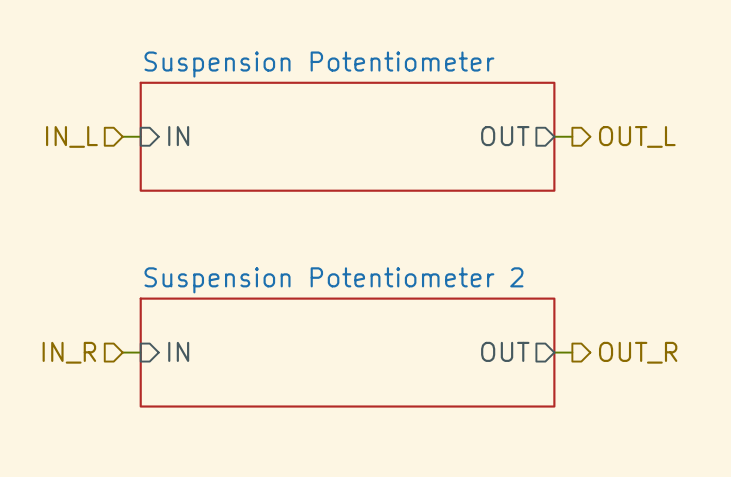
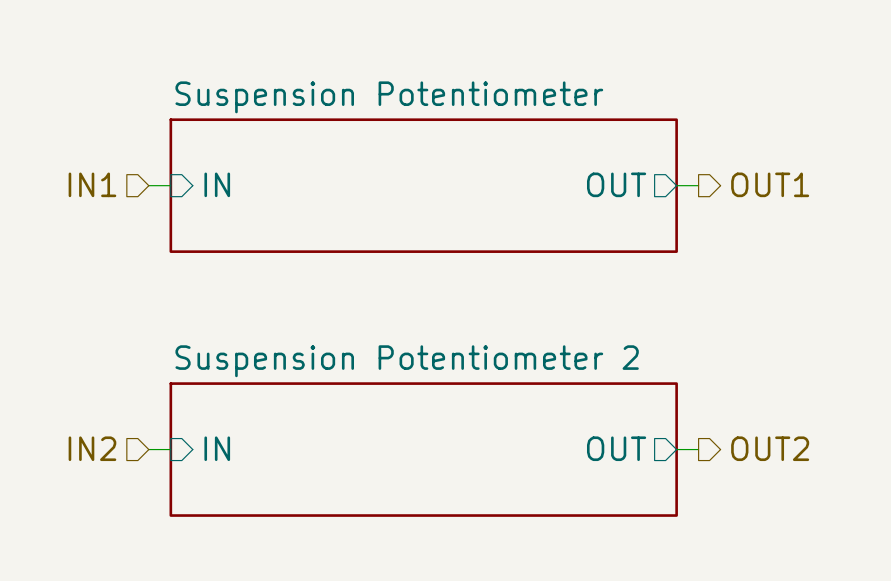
hierarchical label: IN_L (71, 136) -> IN1 (92, 184)
hierarchical label: OUT_L (637, 136) -> OUT1 (770, 184)
hierarchical label: IN_R (69, 352) -> IN2 (92, 448)
hierarchical label: OUT_R (638, 352) -> OUT2 (770, 448)

